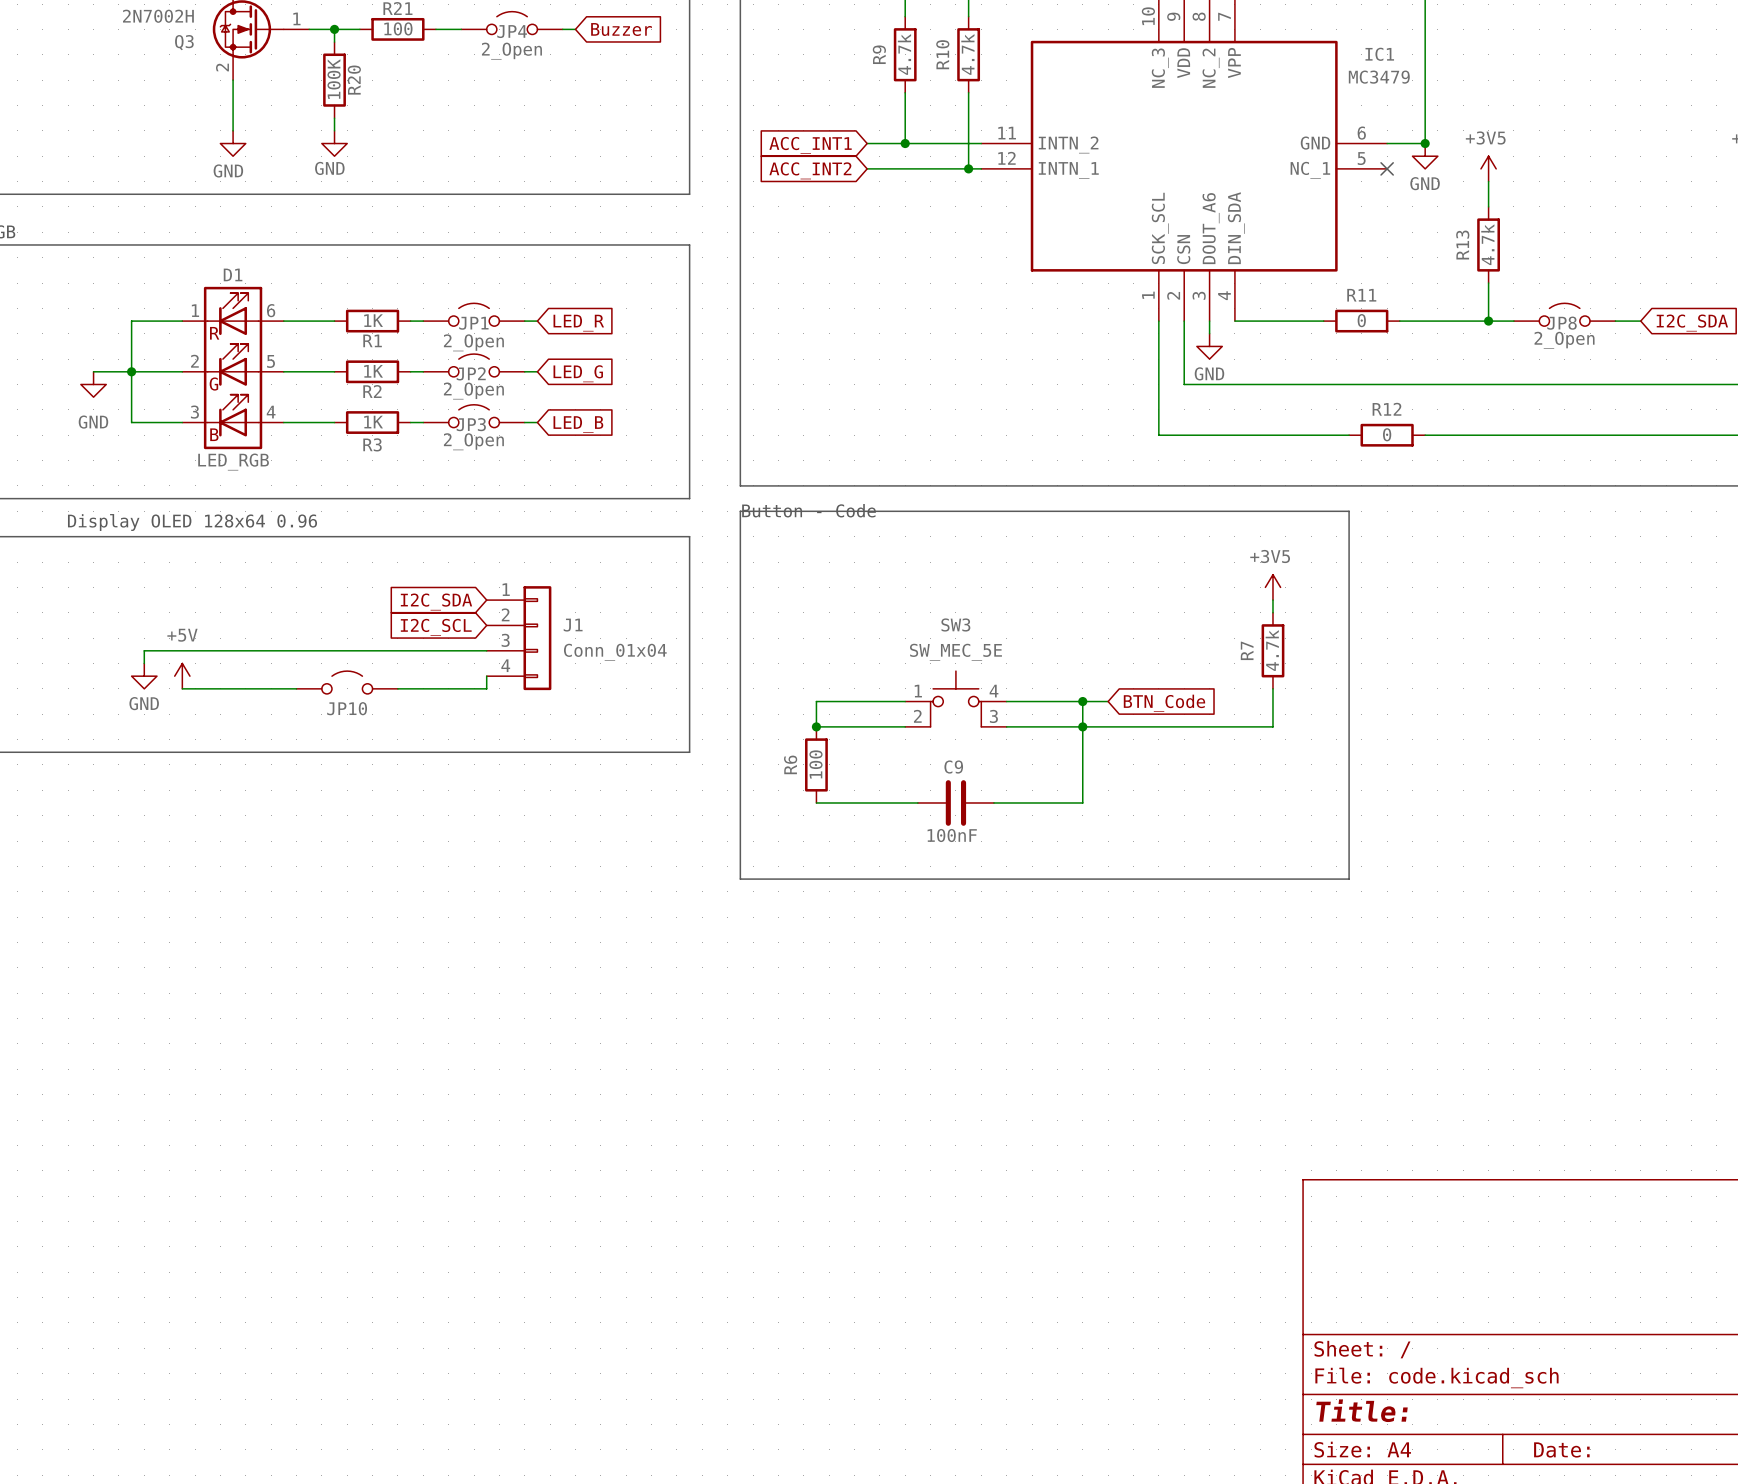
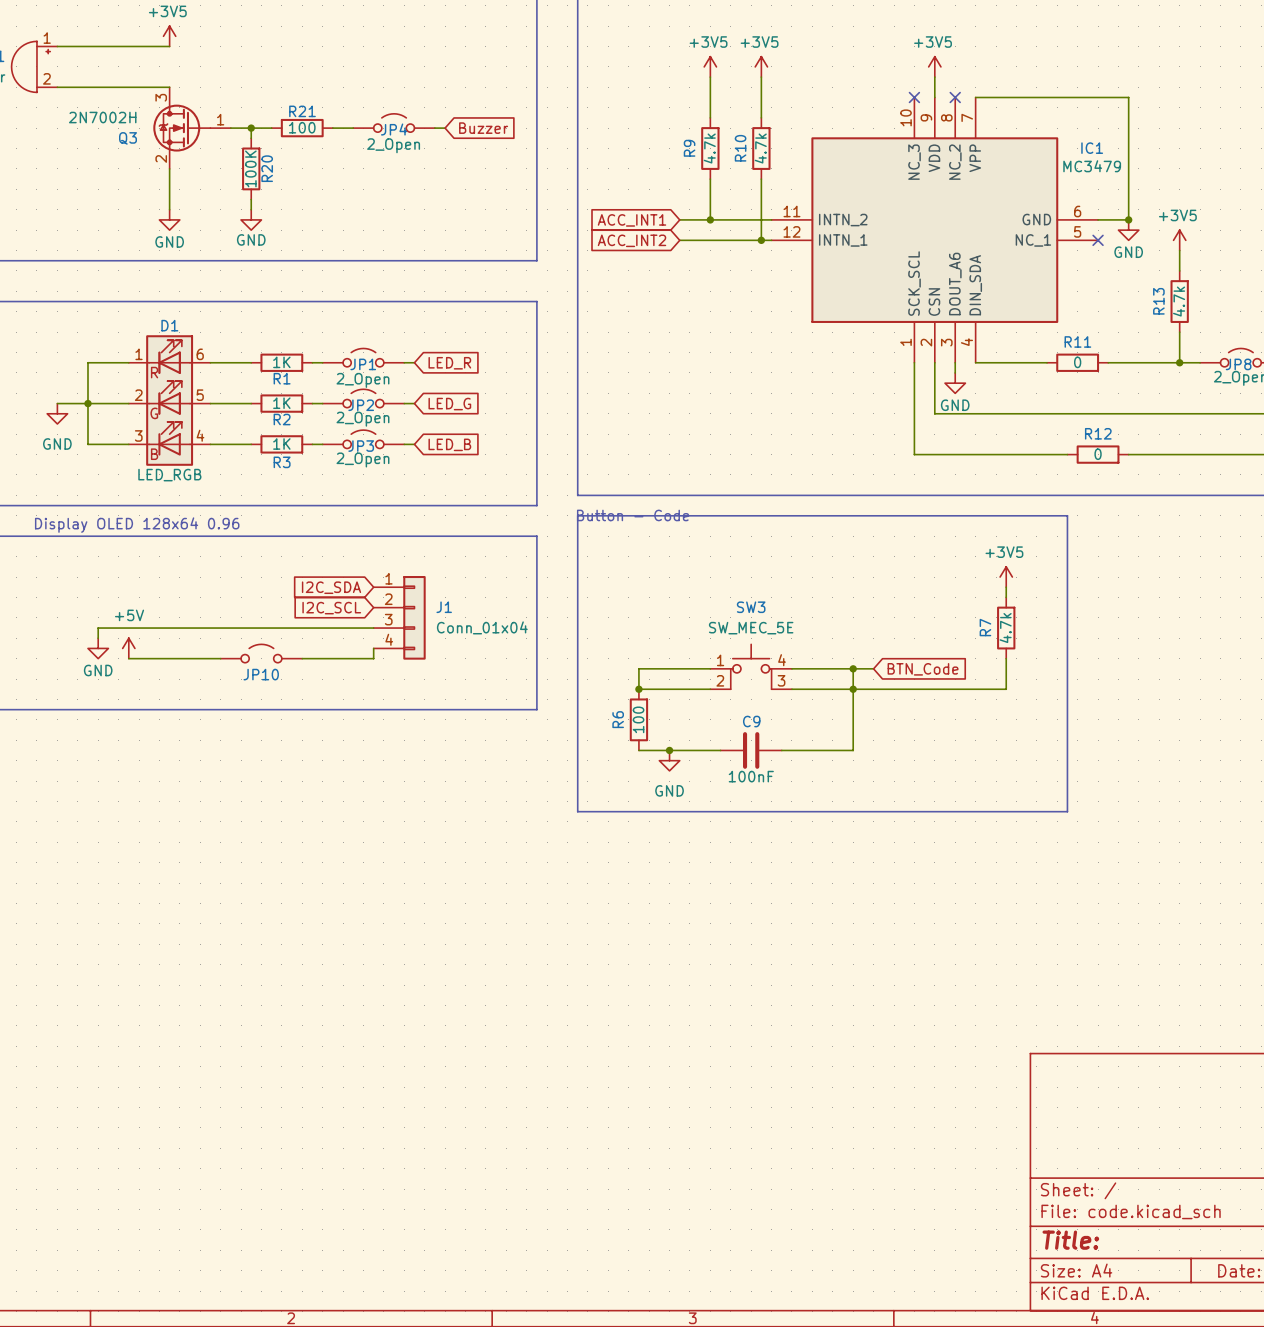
junction: none -> (669, 750)
power symbol: none -> GND (669, 760)

